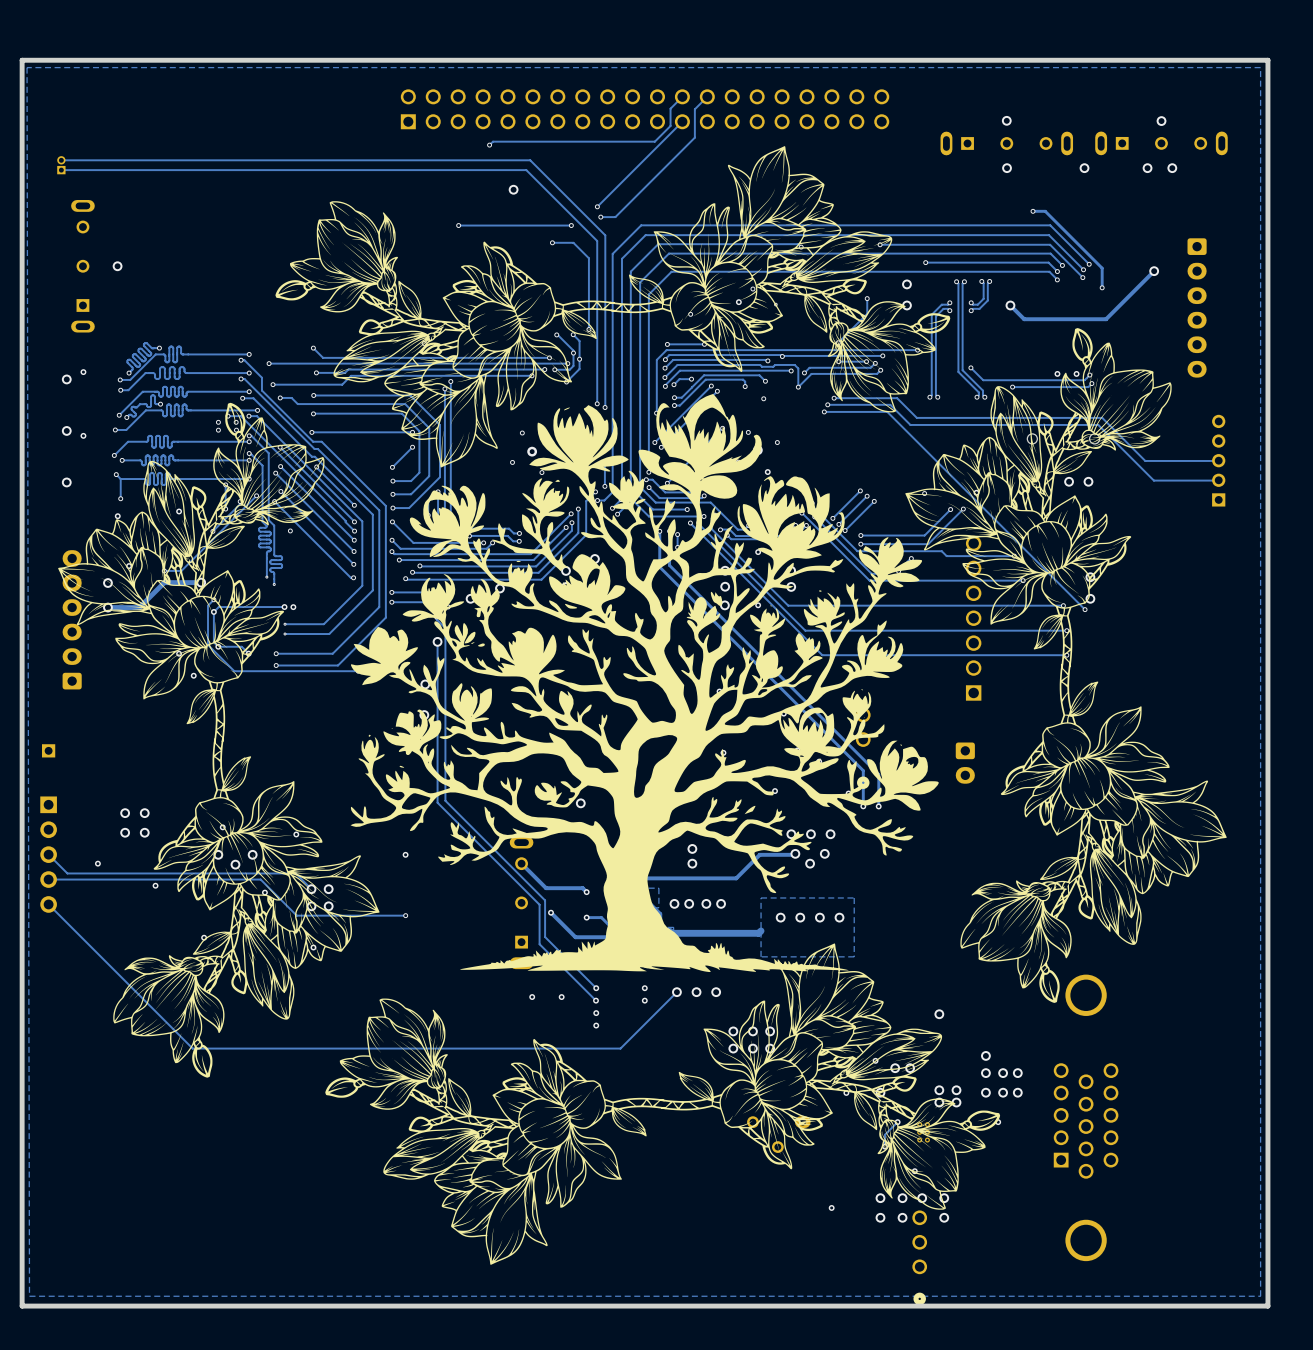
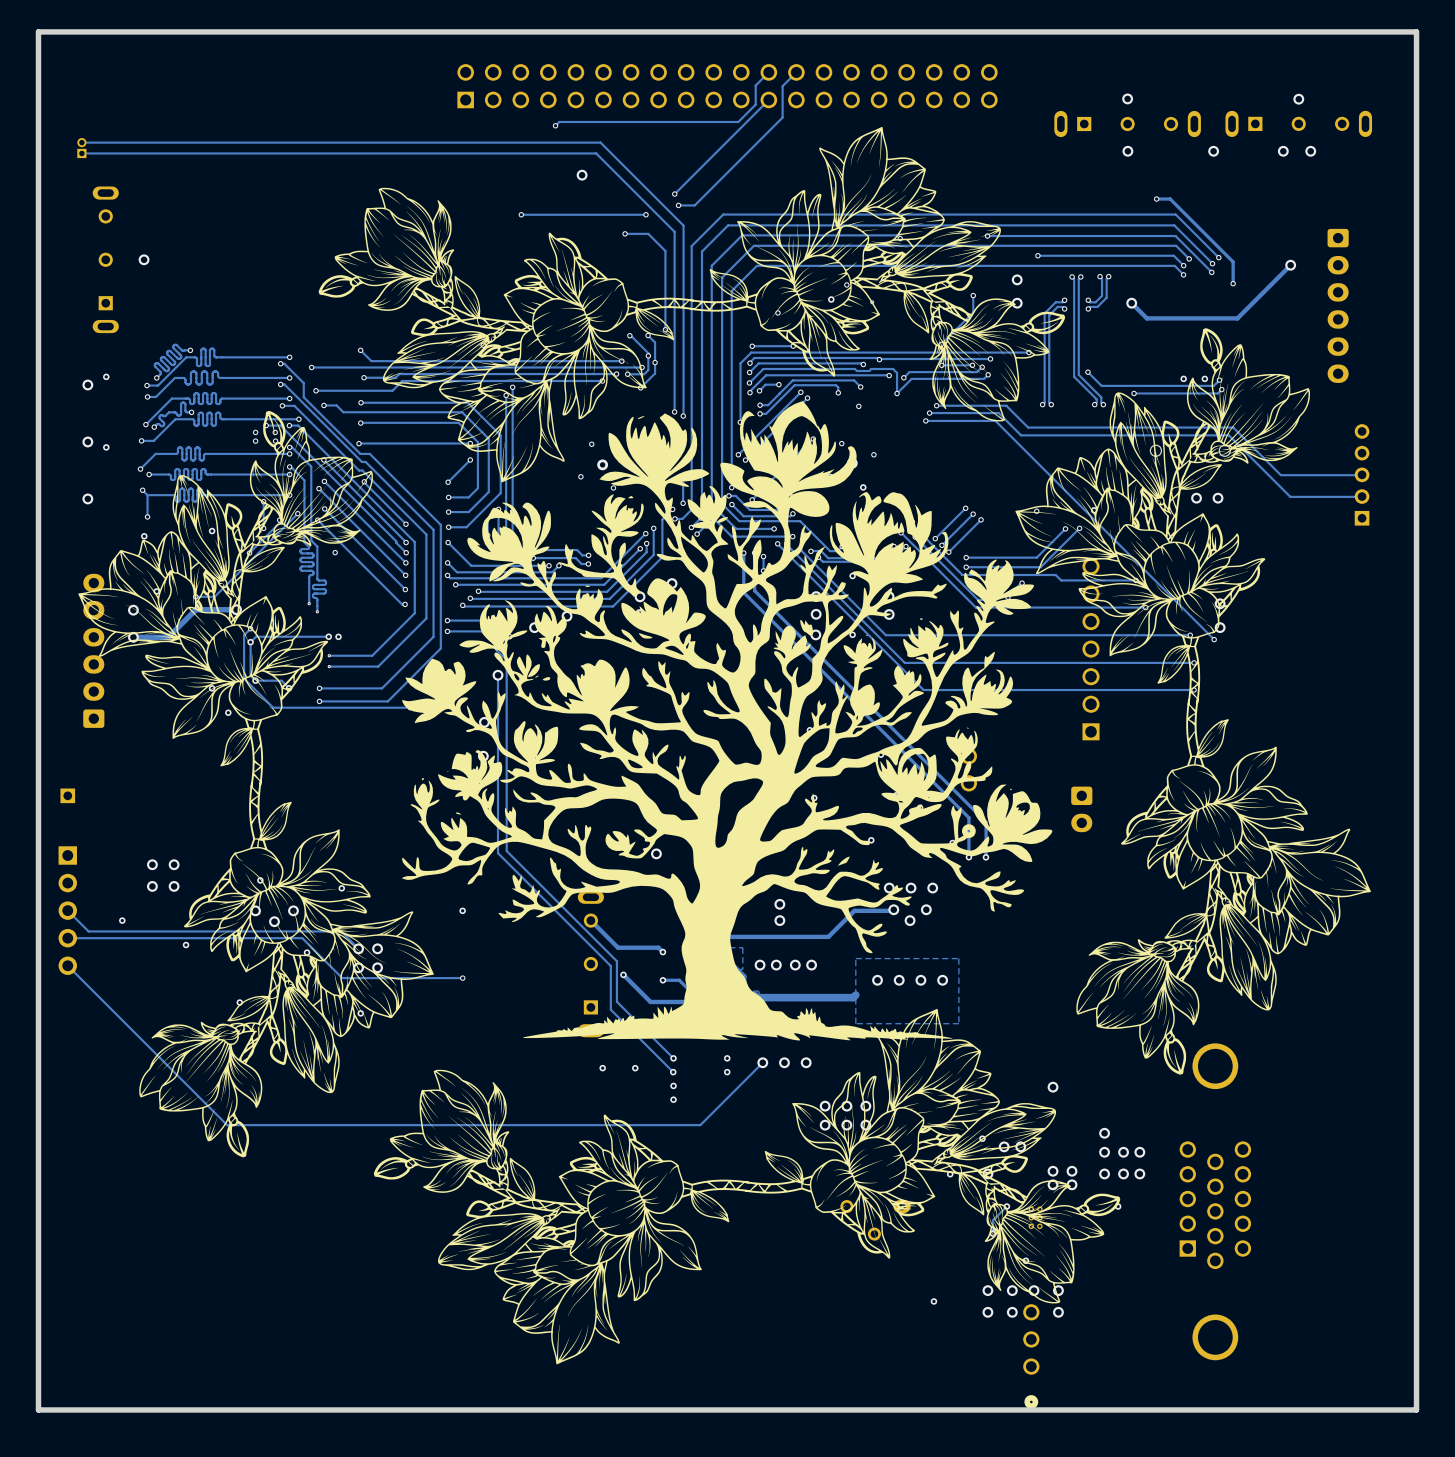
zone outline: (1260, 67) (27, 67) (29, 1296) (1260, 1296) (1260, 67) -> none

